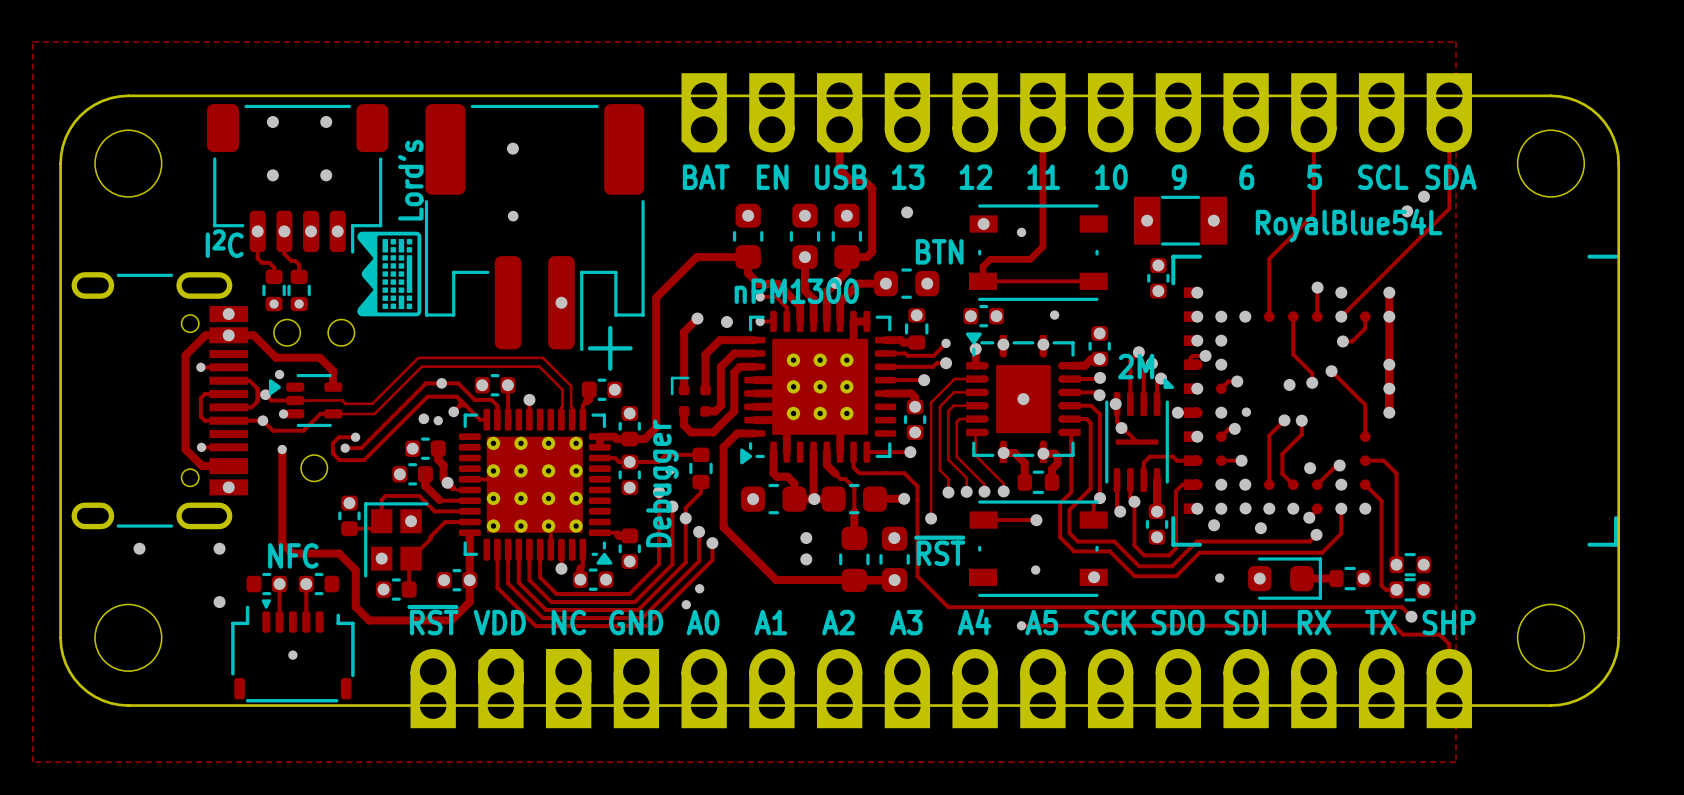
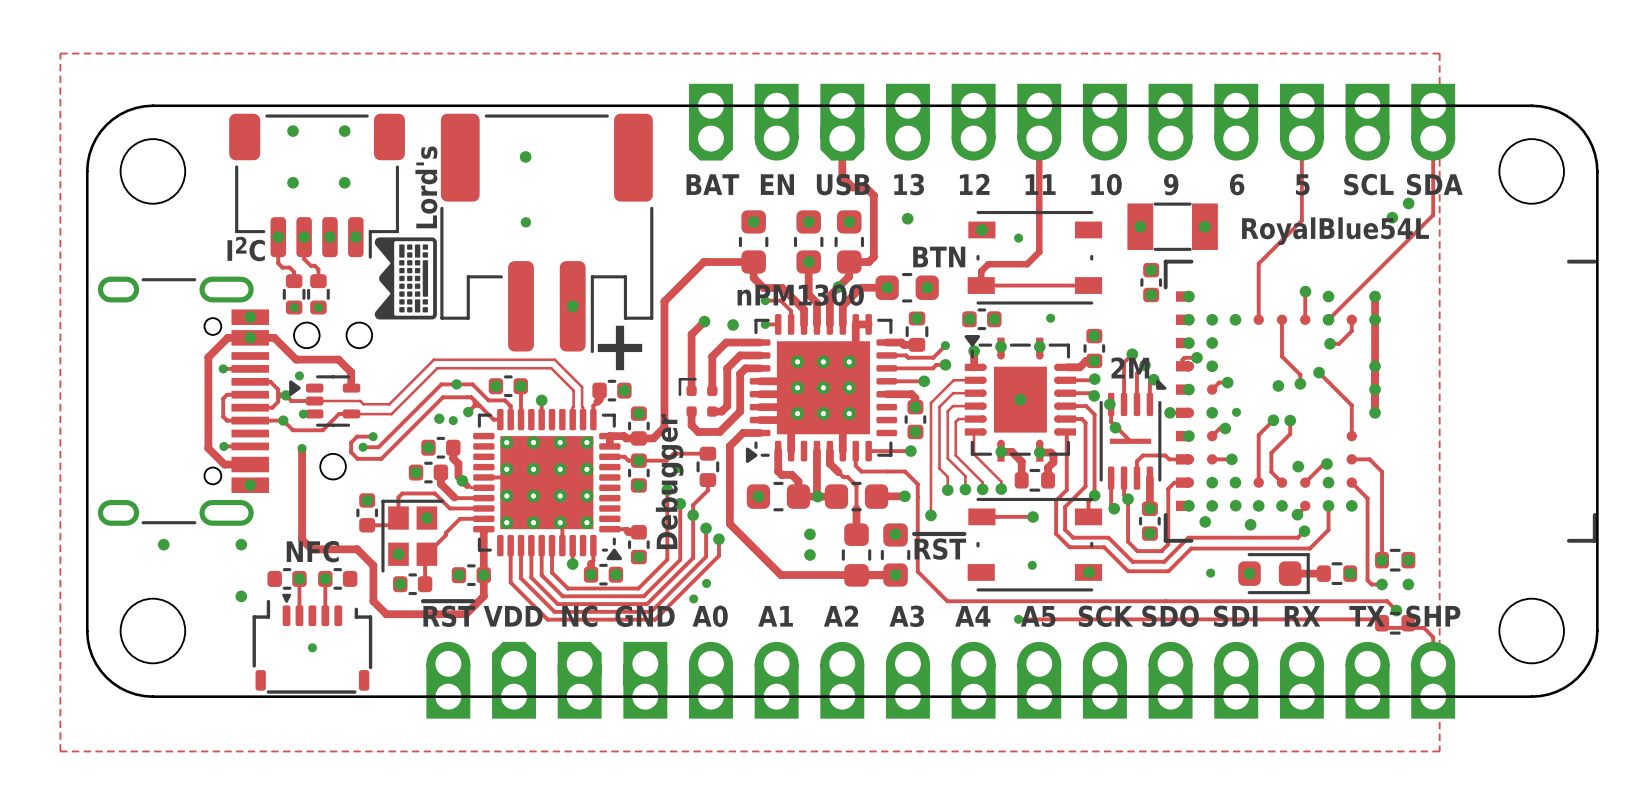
part position: (1410, 589) -> (1395, 623)

